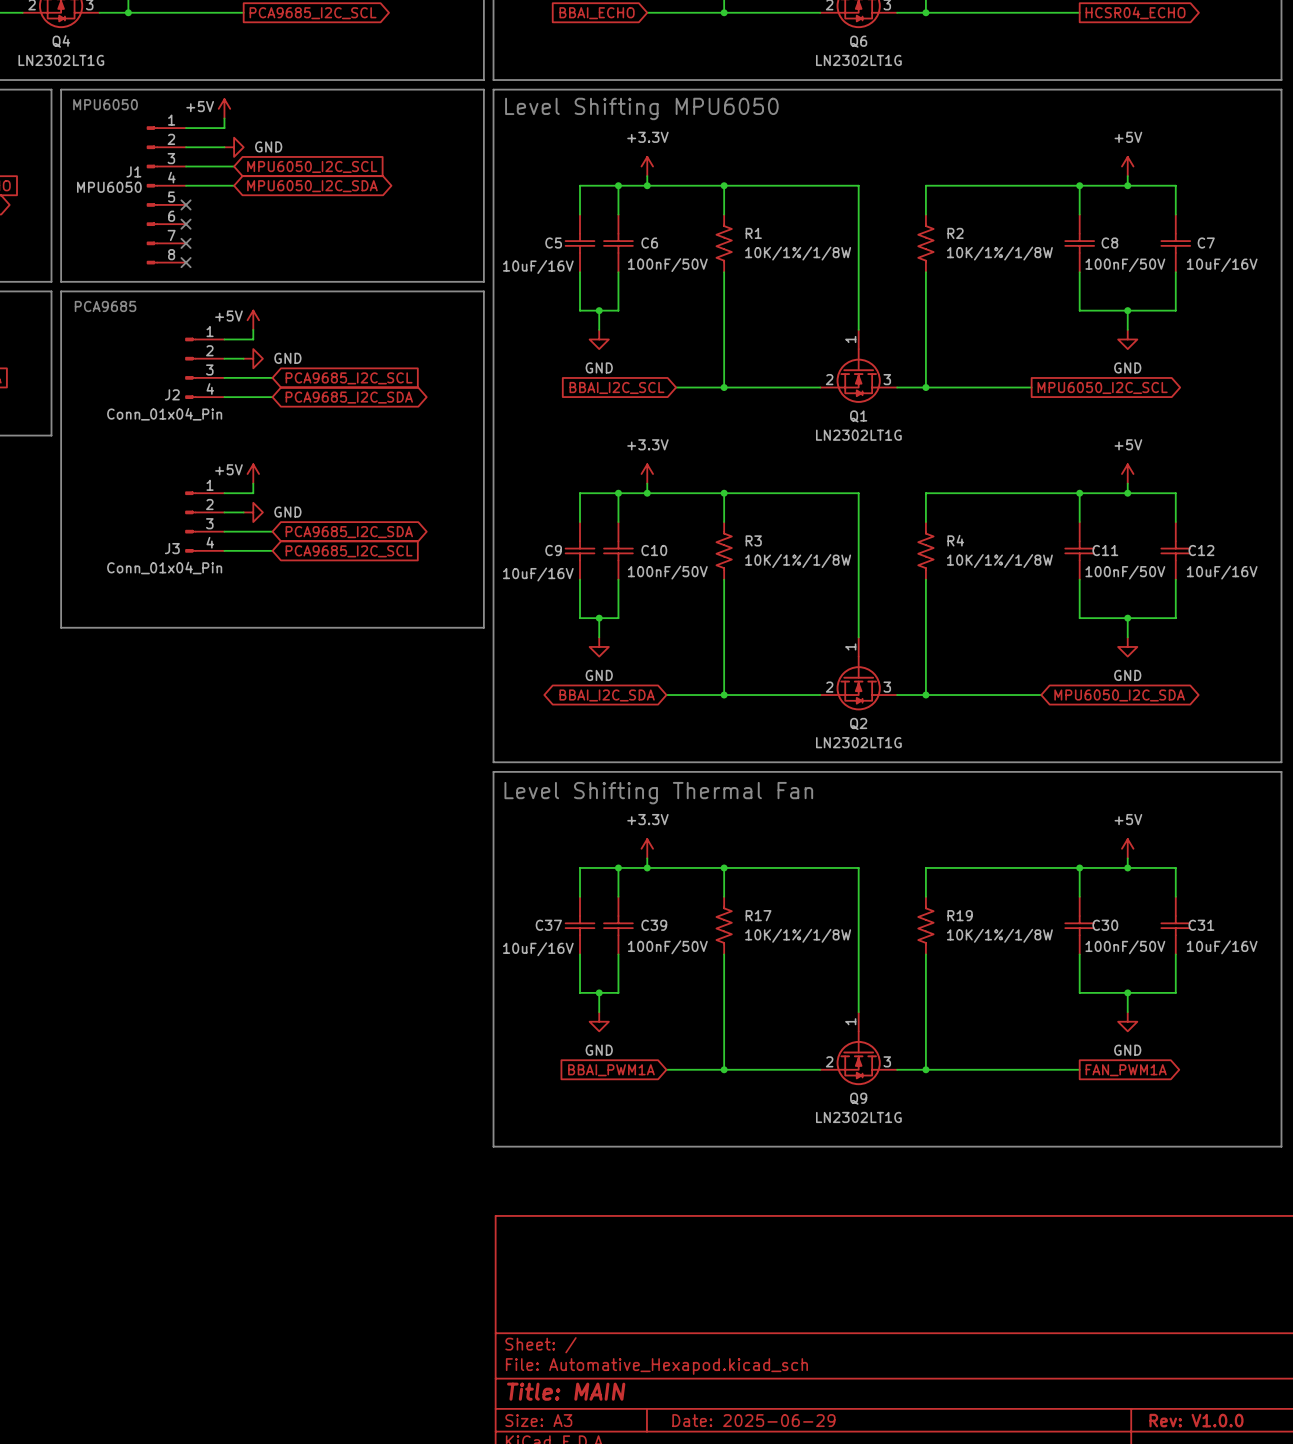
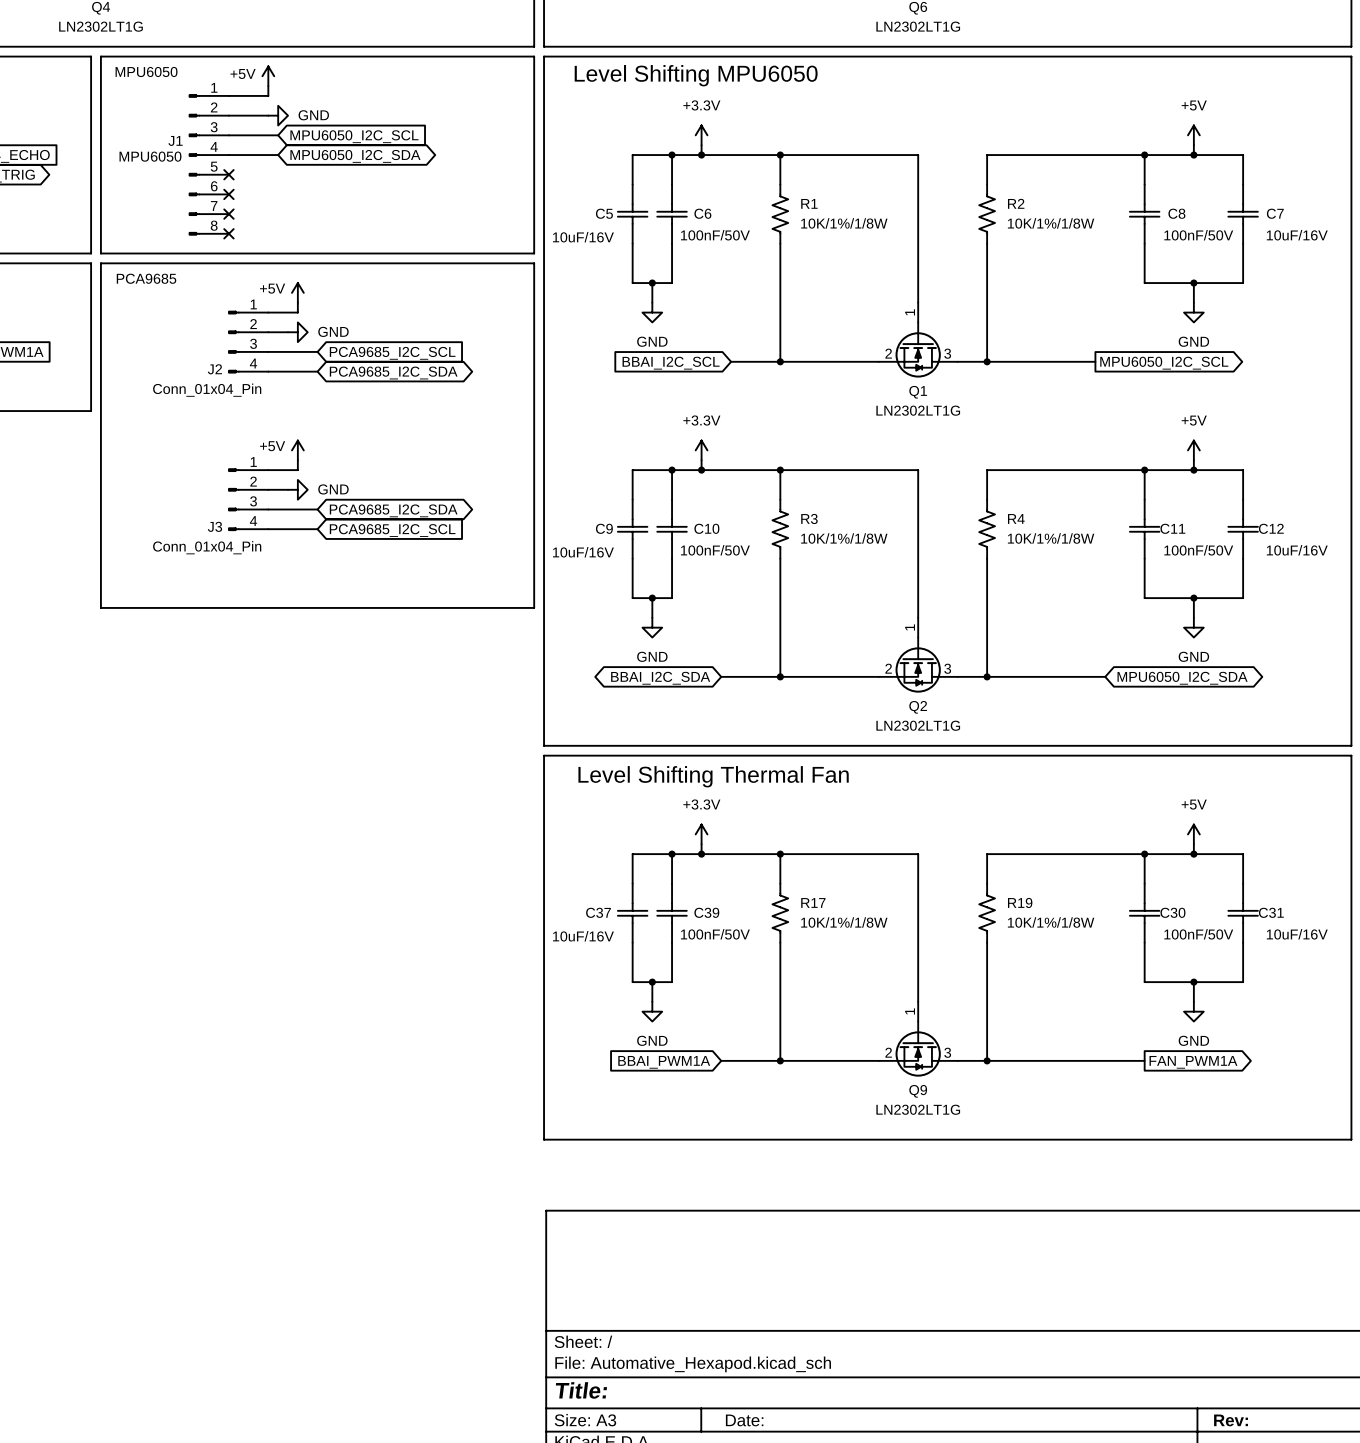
title block: Title: MAIN (566, 1391) -> Title: (581, 1390)
title block: Date: 2025-06-29 (753, 1420) -> Date: (744, 1420)
title block: Rev: V1.0.0 (1196, 1420) -> Rev: (1231, 1420)

